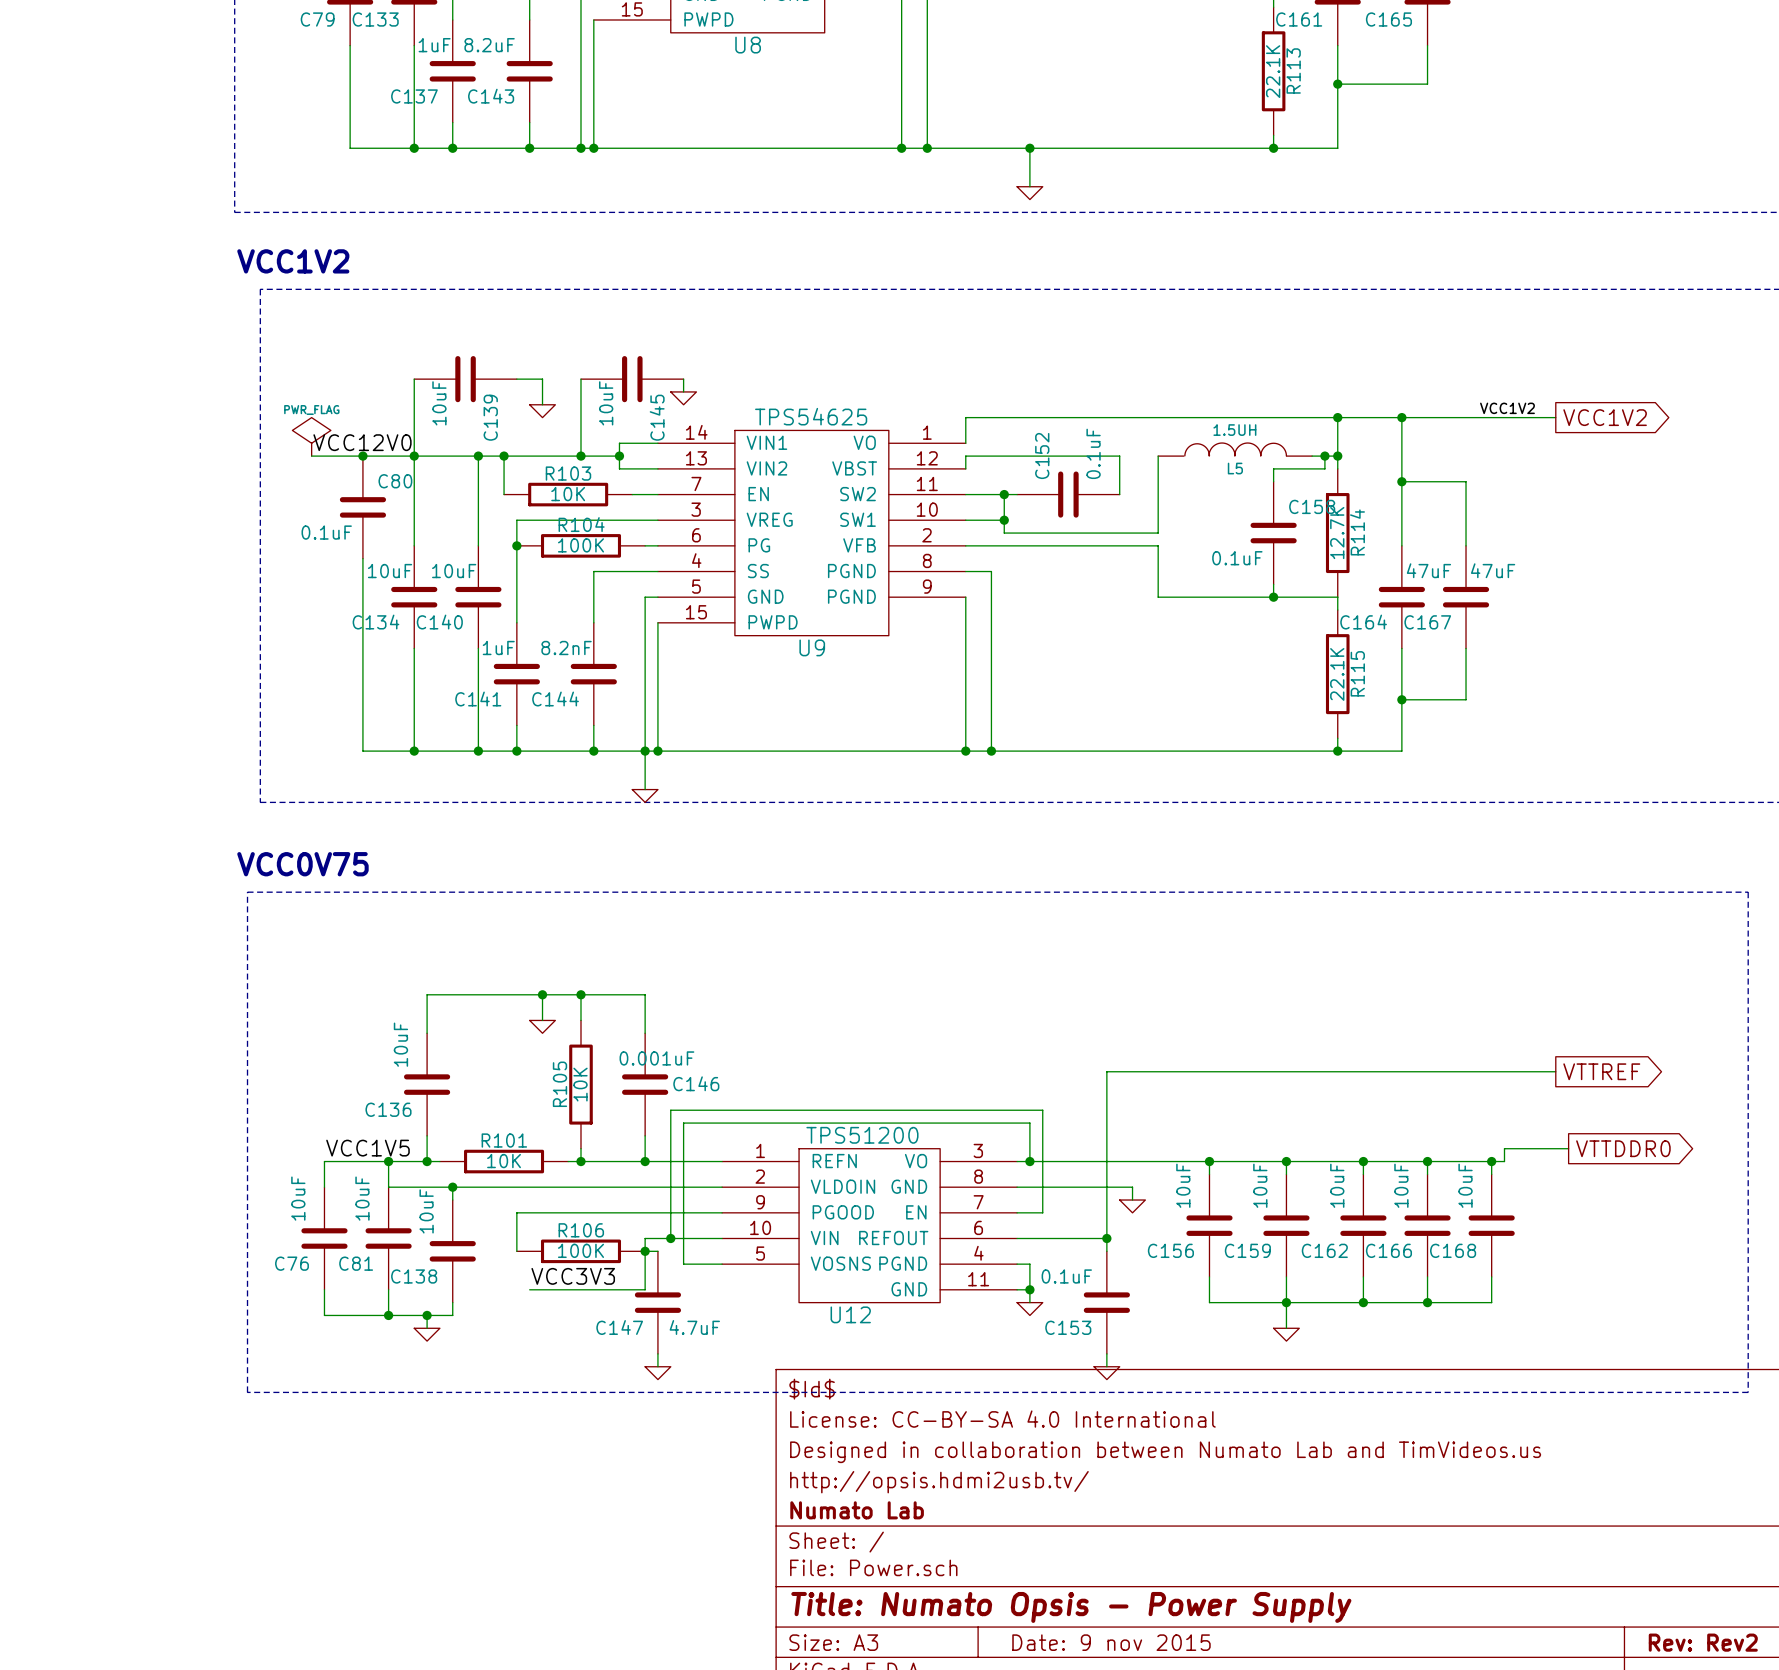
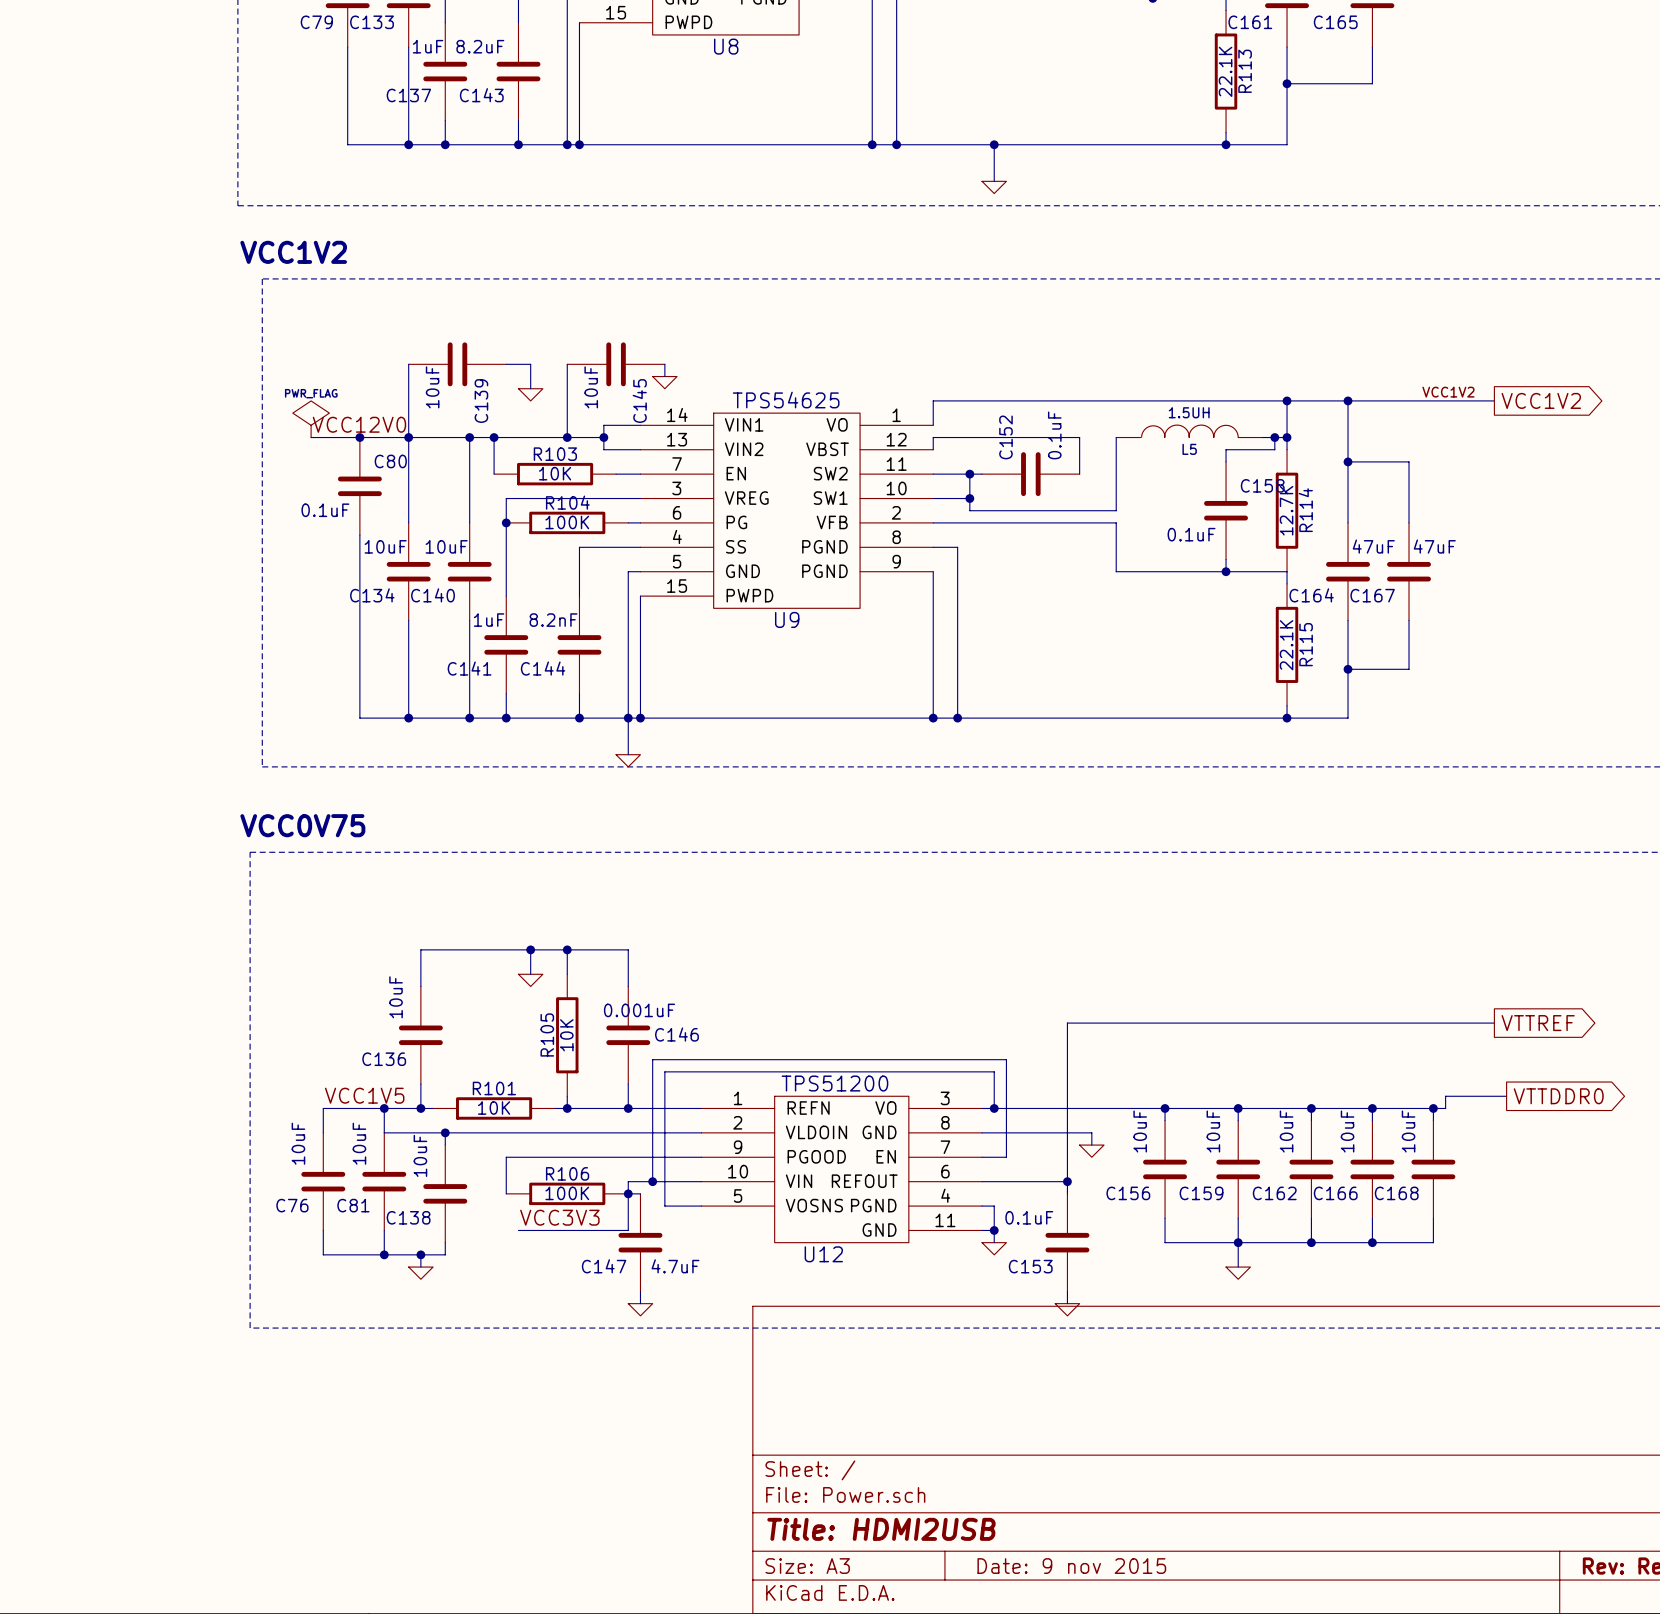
title block: $Id$ (812, 1389) -> none
title block: License: CC-BY-SA 4.0 International (1002, 1419) -> none
title block: Designed in collaboration between Numato Lab and TimVideos.us (1165, 1452) -> none
title block: http://opsis.hdmi2usb.tv/ (939, 1482) -> none
title block: Numato Lab (857, 1510) -> none
title block: Title: Numato Opsis - Power Supply (1071, 1607) -> Title: HDMI2USB (881, 1529)

